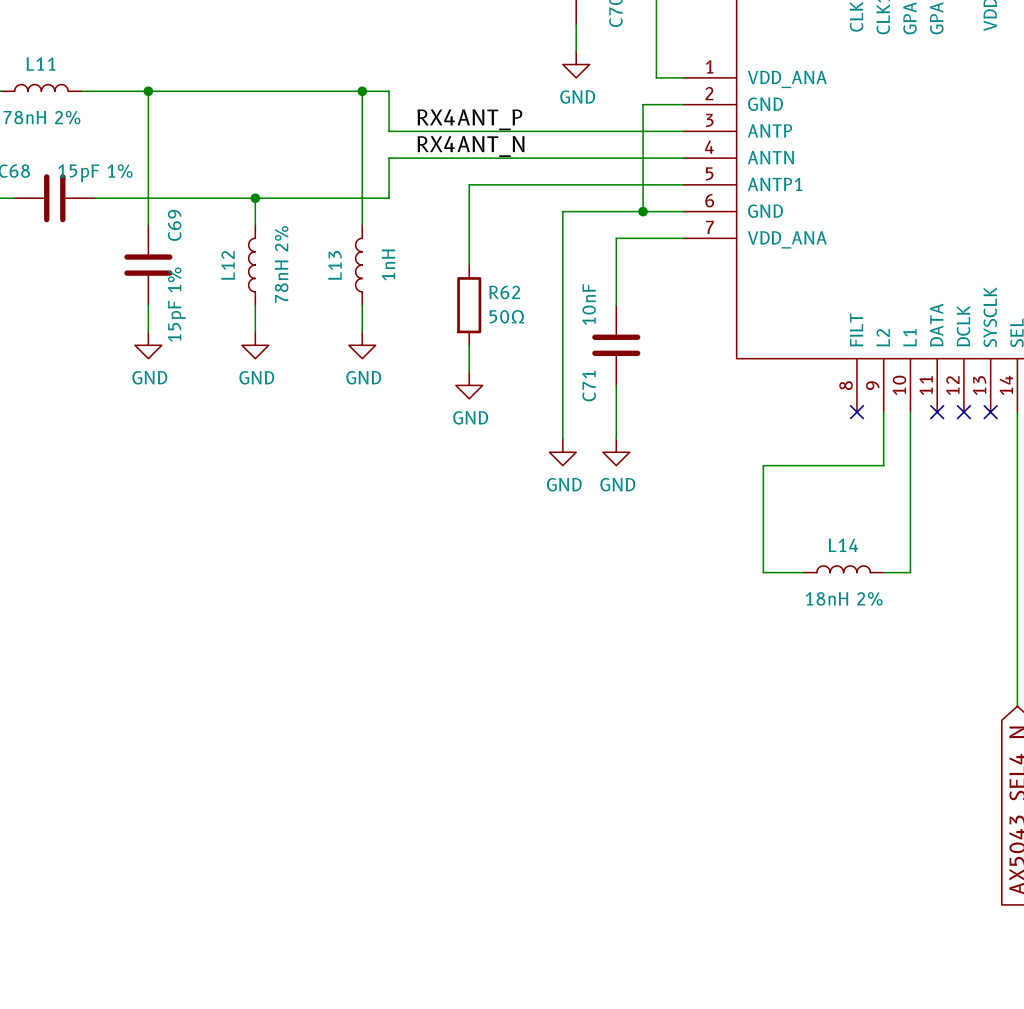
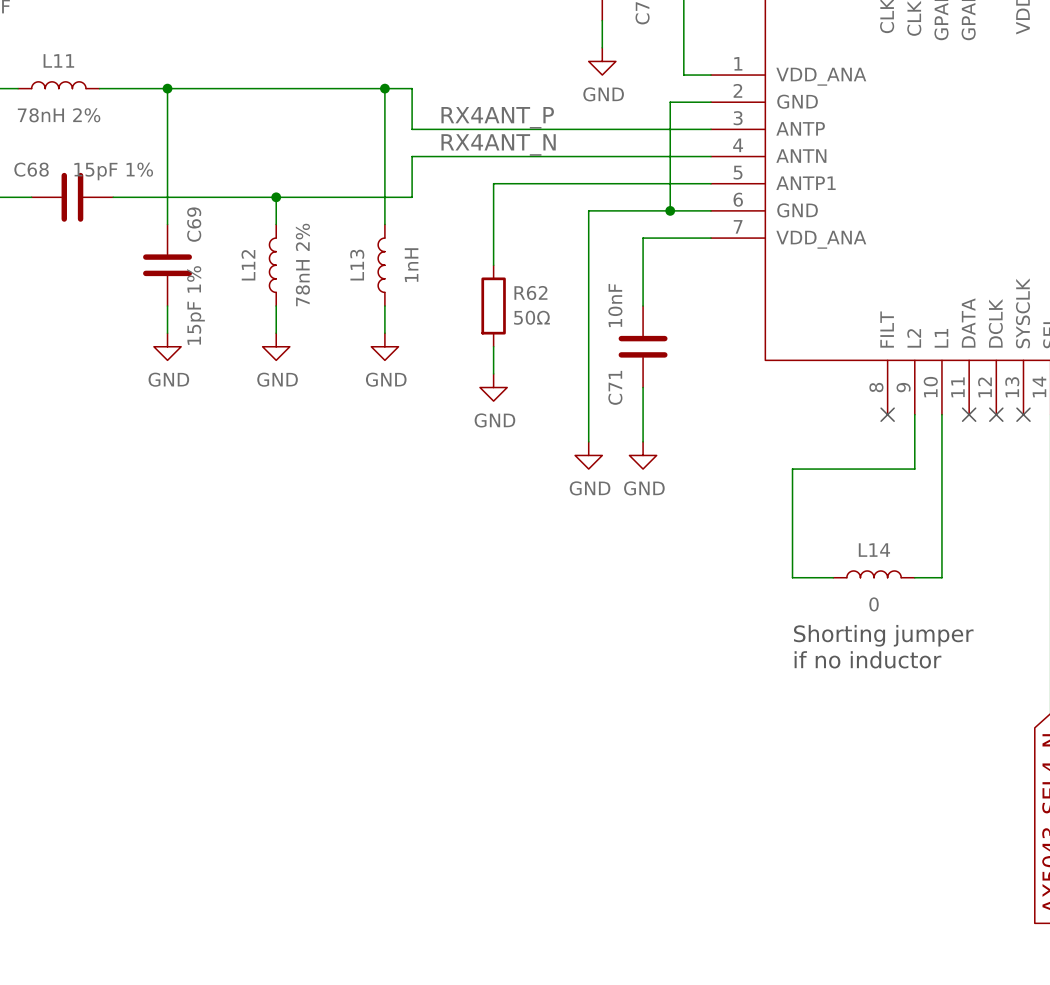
L14 value: 18nH 2% (844, 598) -> 0 (874, 604)
text: none -> Shorting jumper (883, 635)
text: none -> if no inductor (867, 659)

